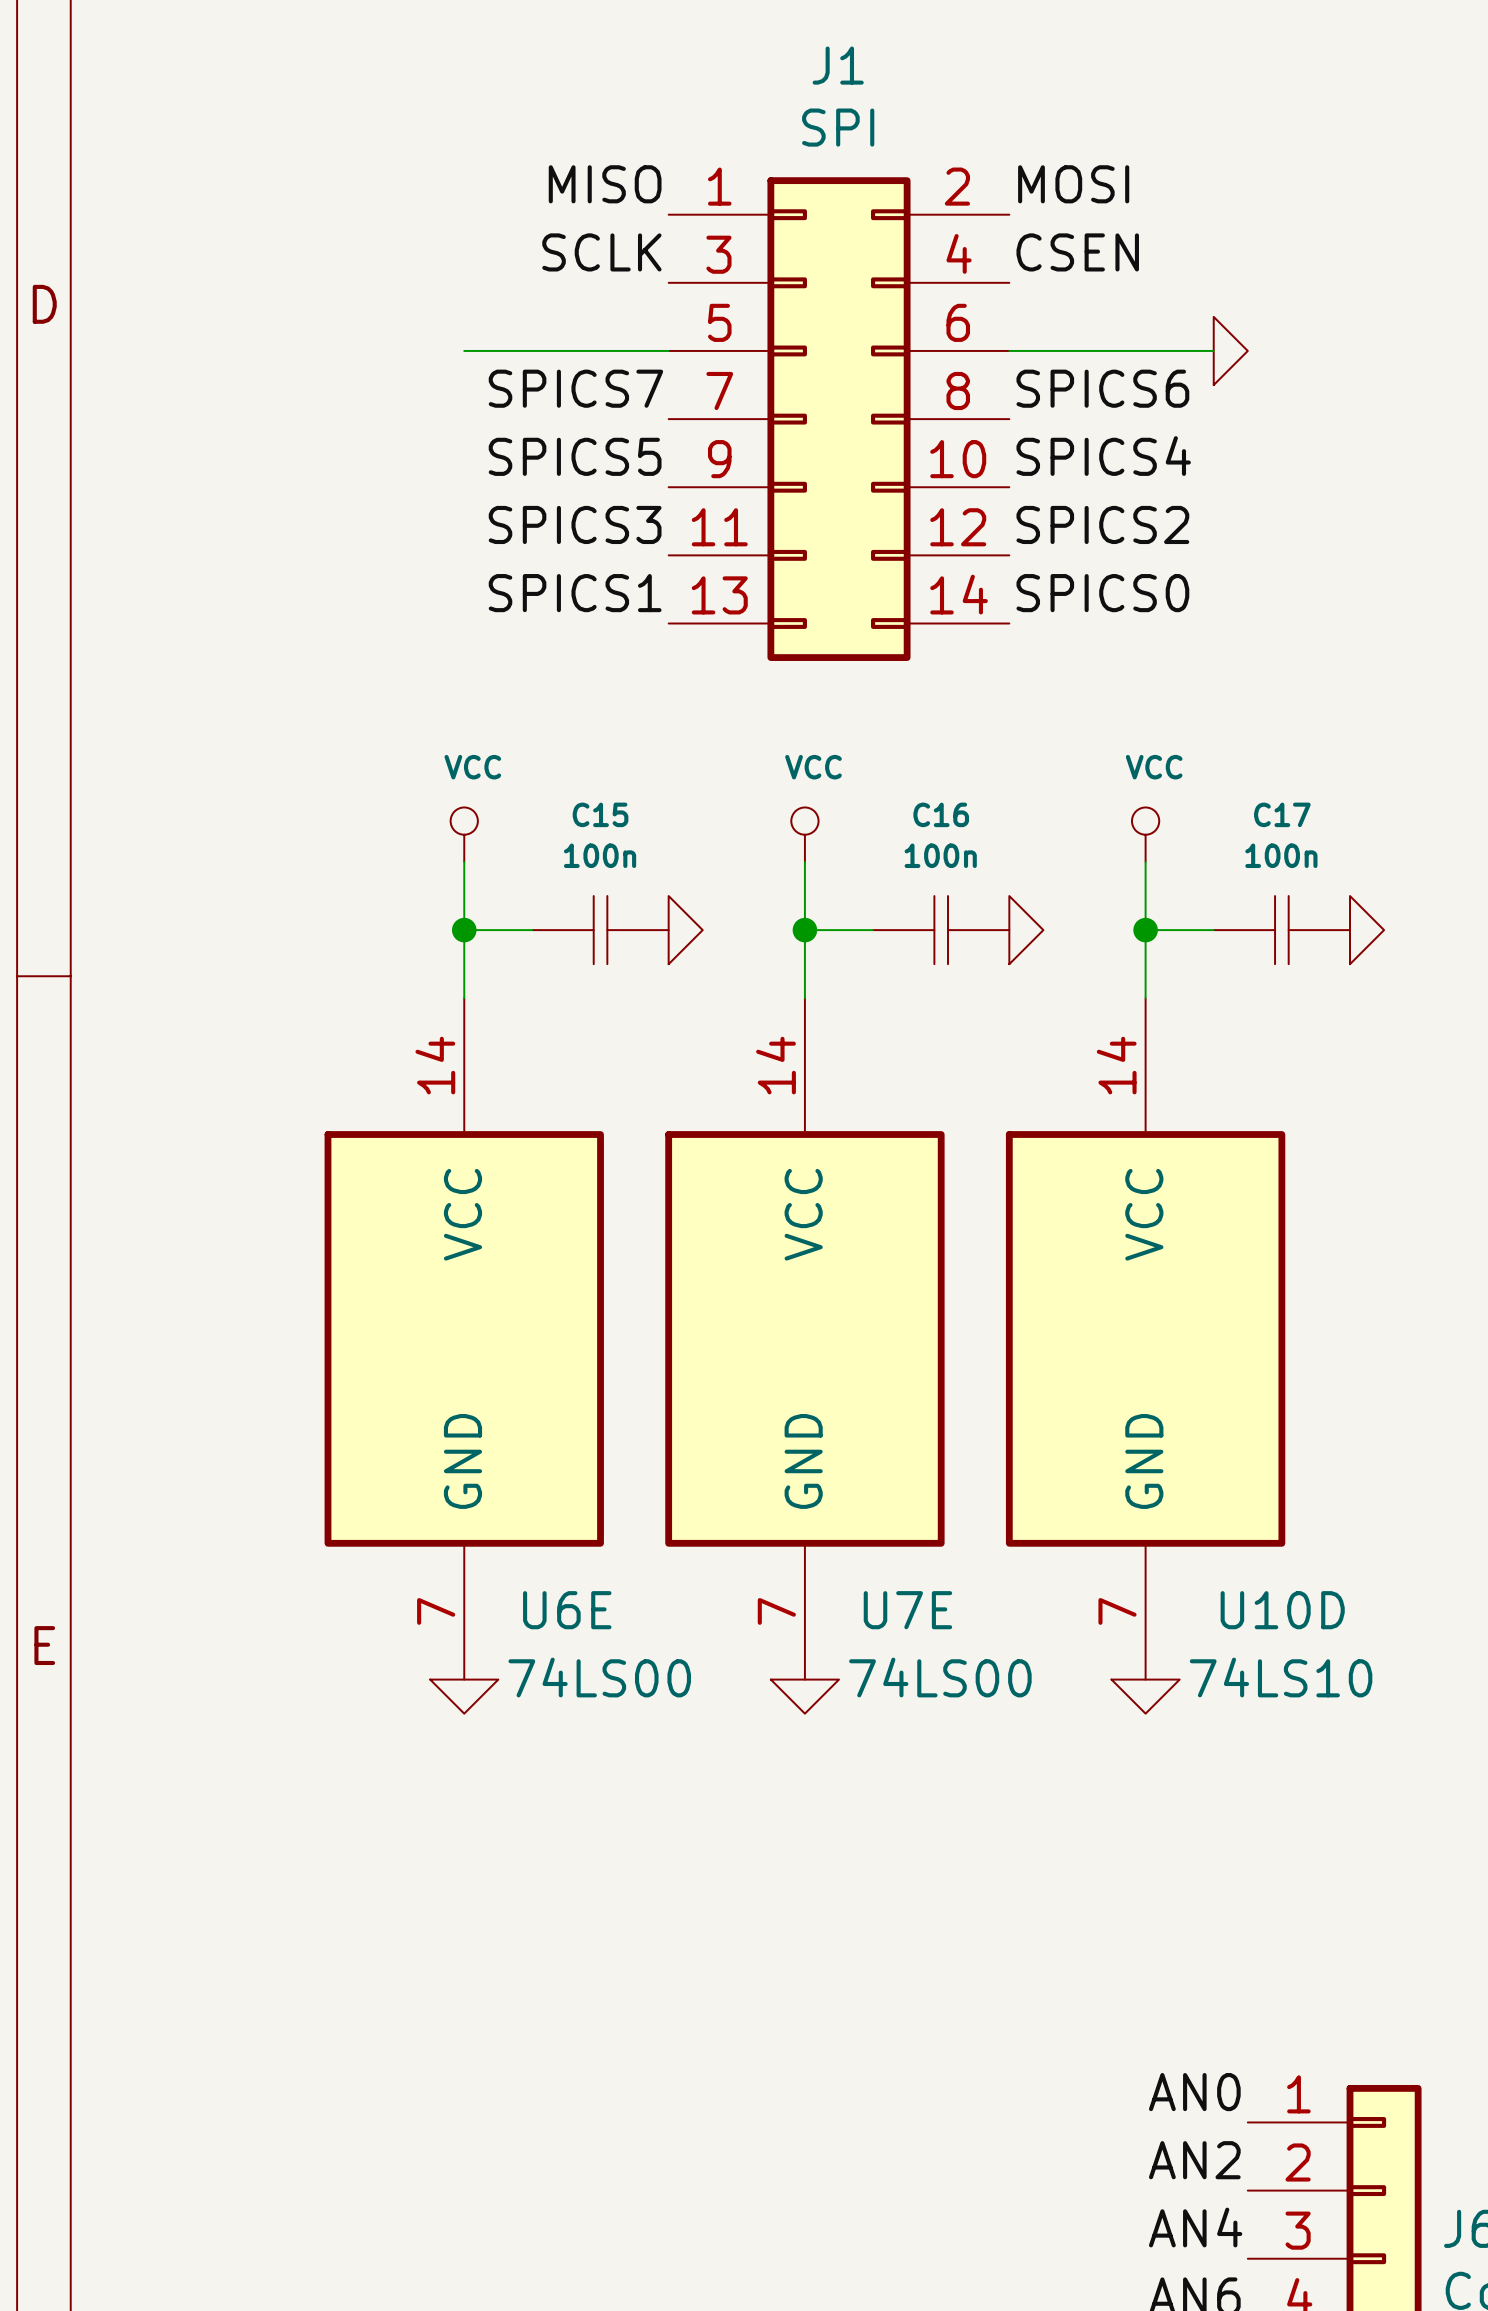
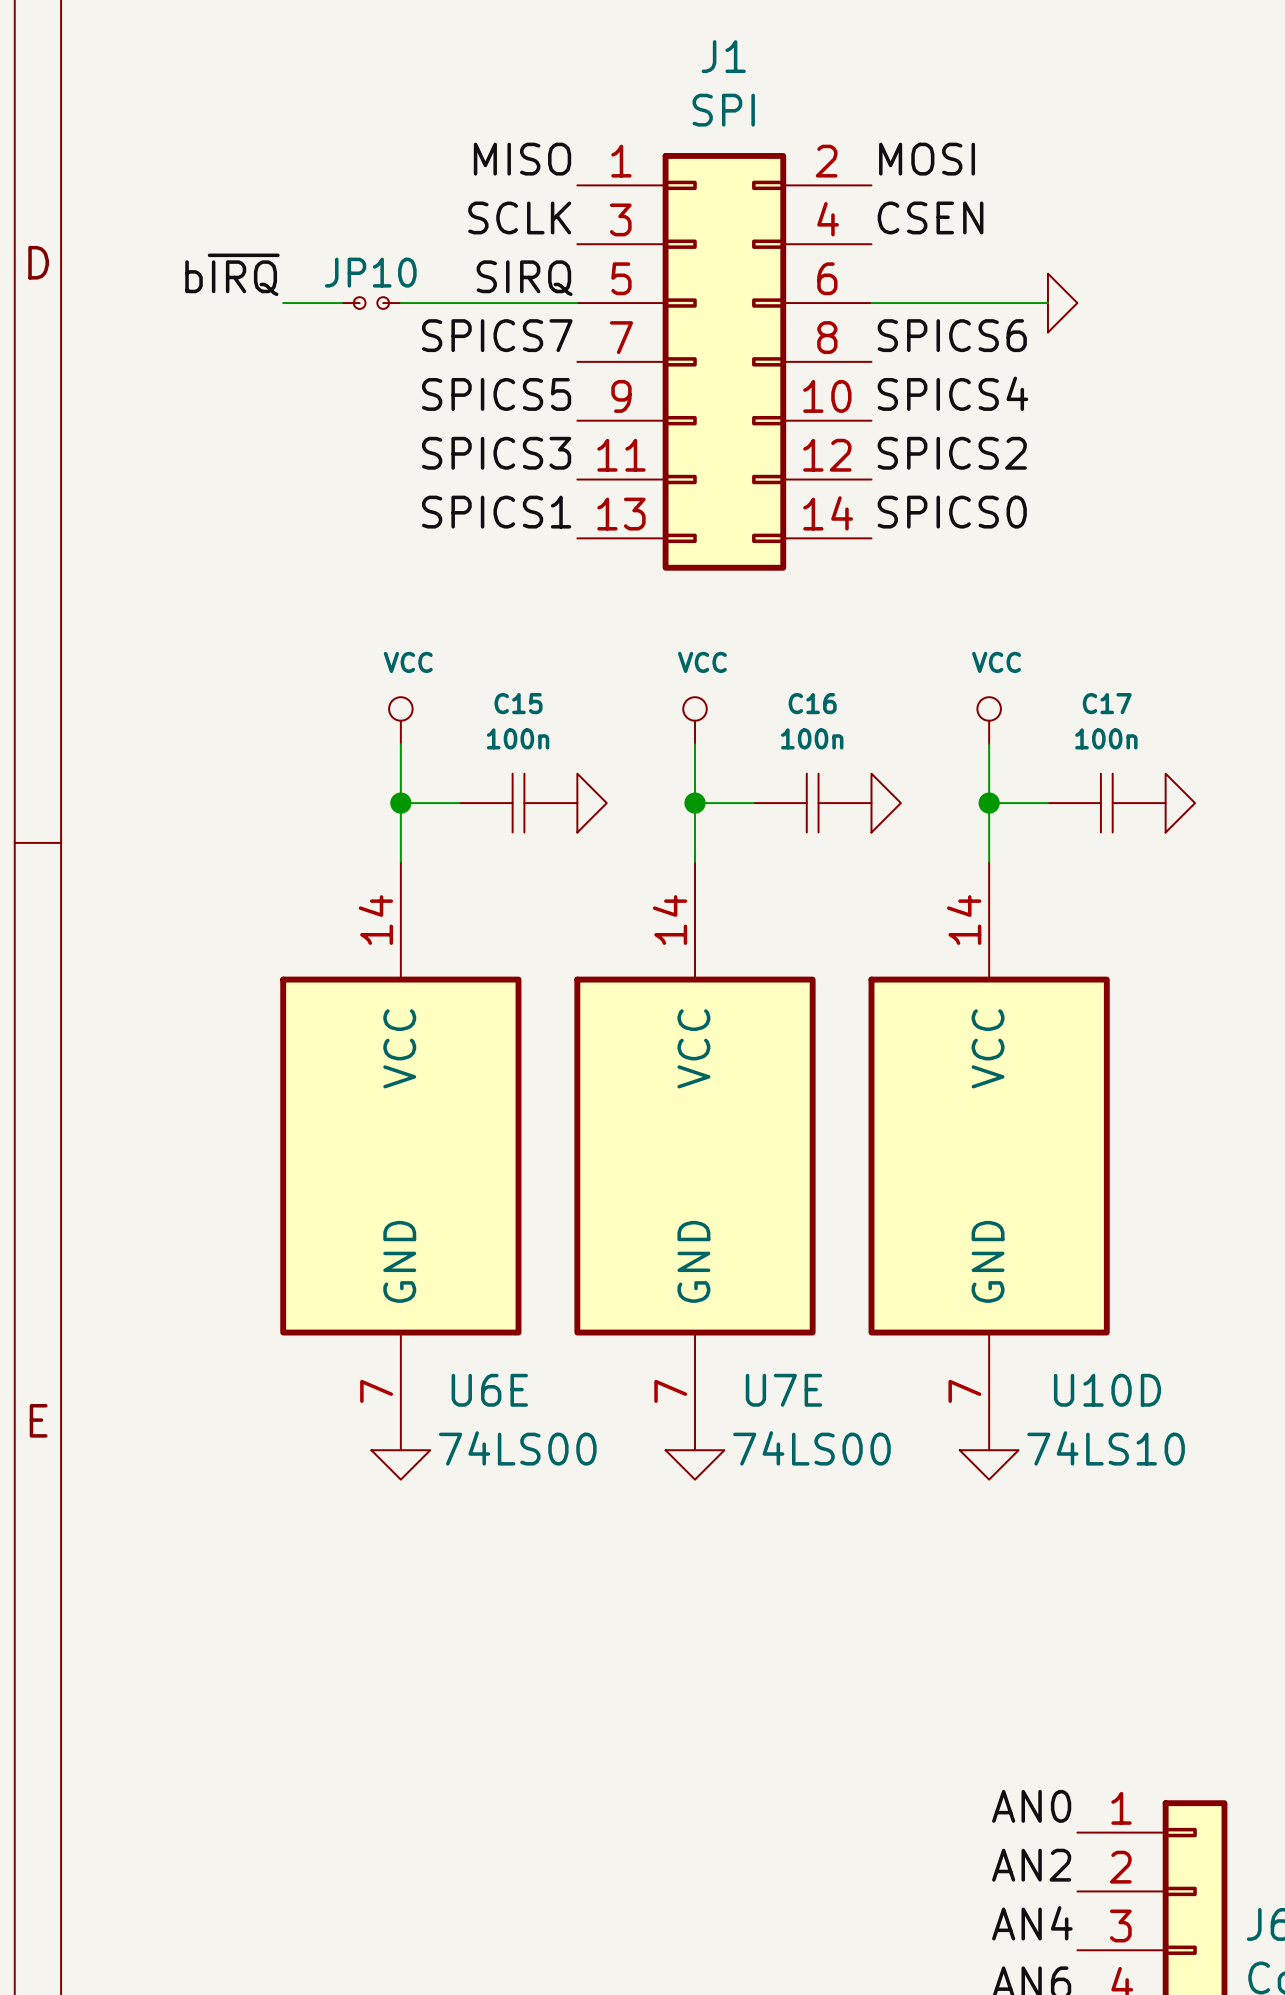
label: none -> b~{IRQ} (232, 274)
label: none -> SIRQ (524, 278)
wire: none -> (283, 303) (342, 303)
JP10: none -> (371, 303)

